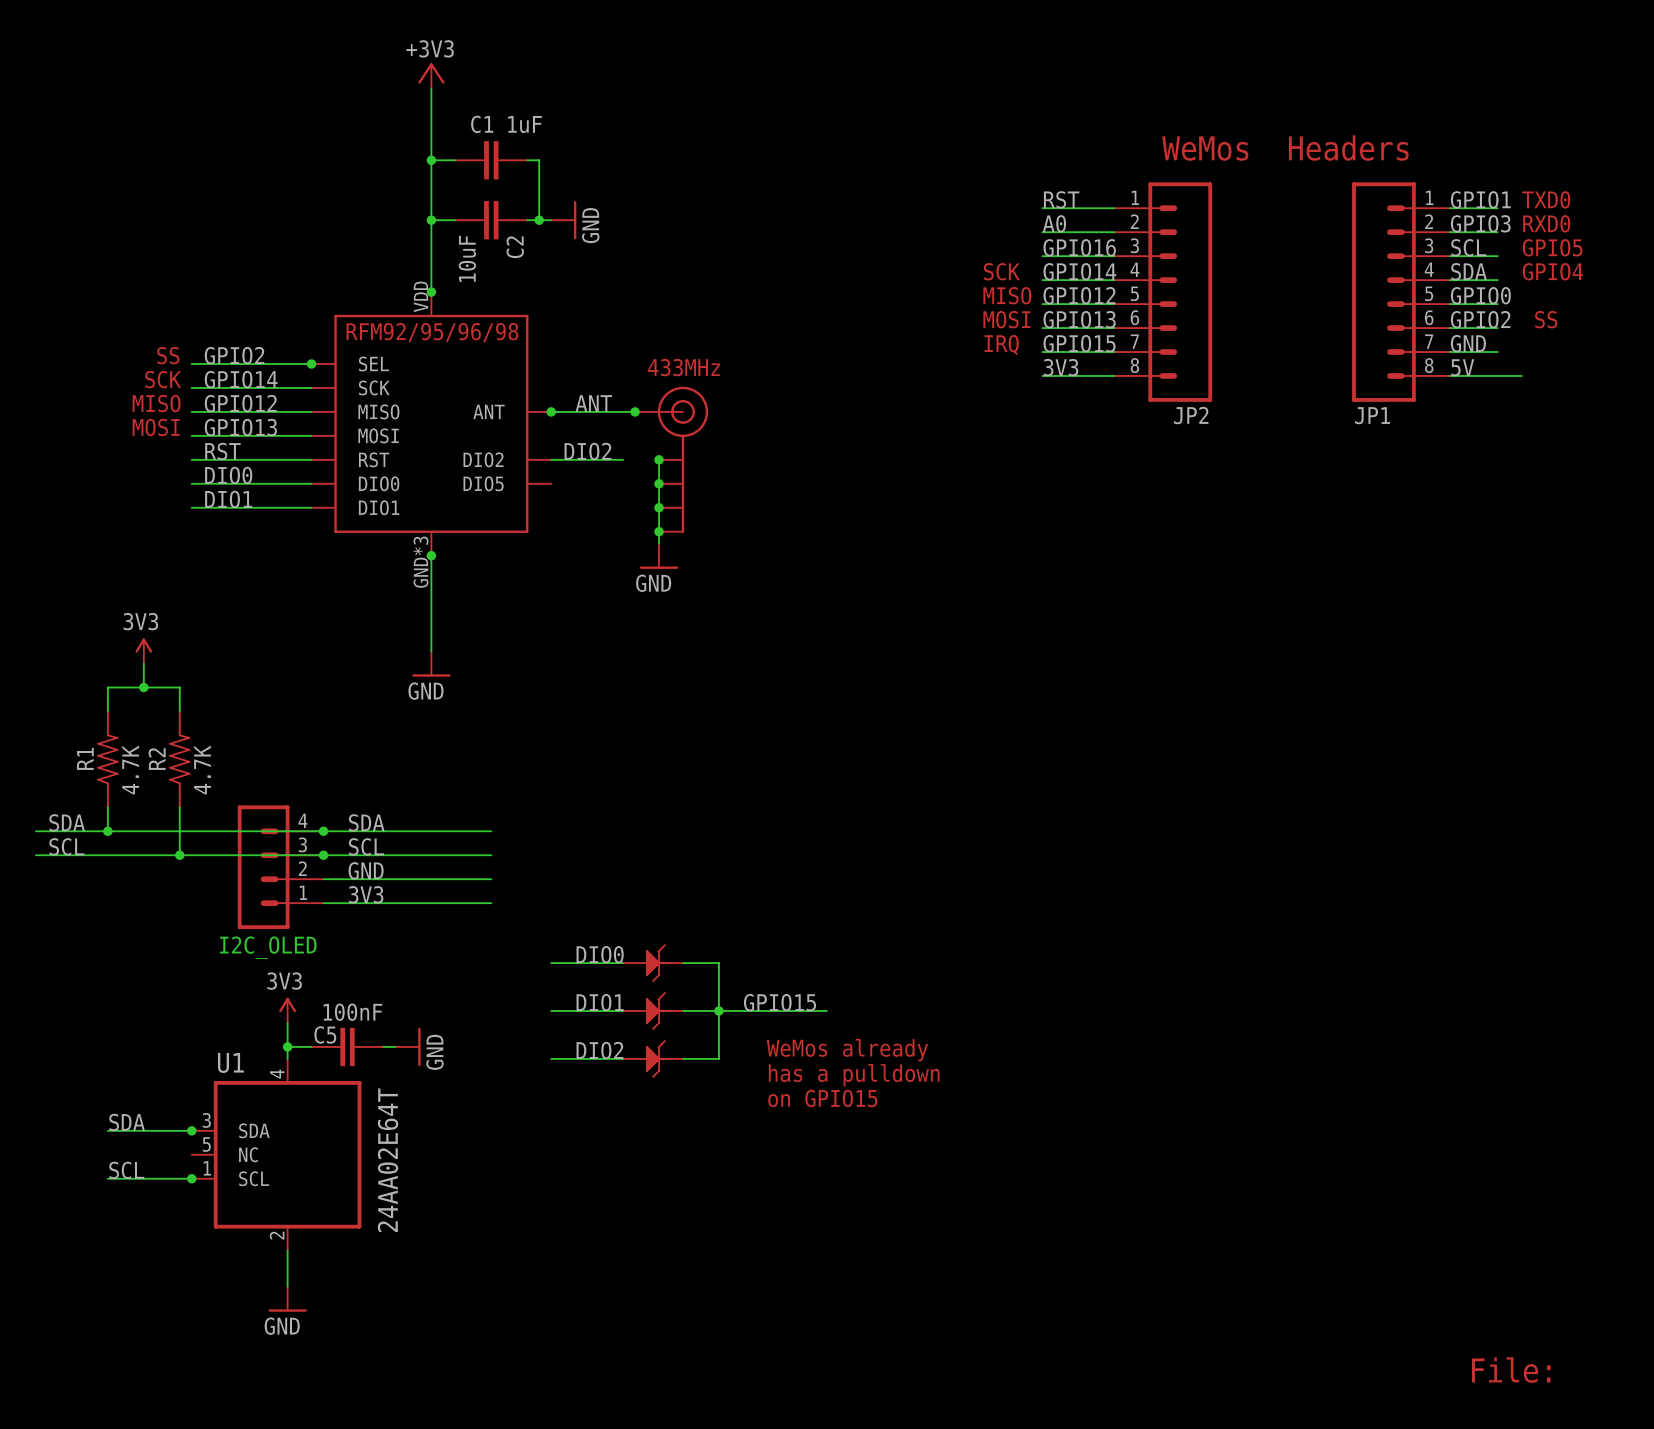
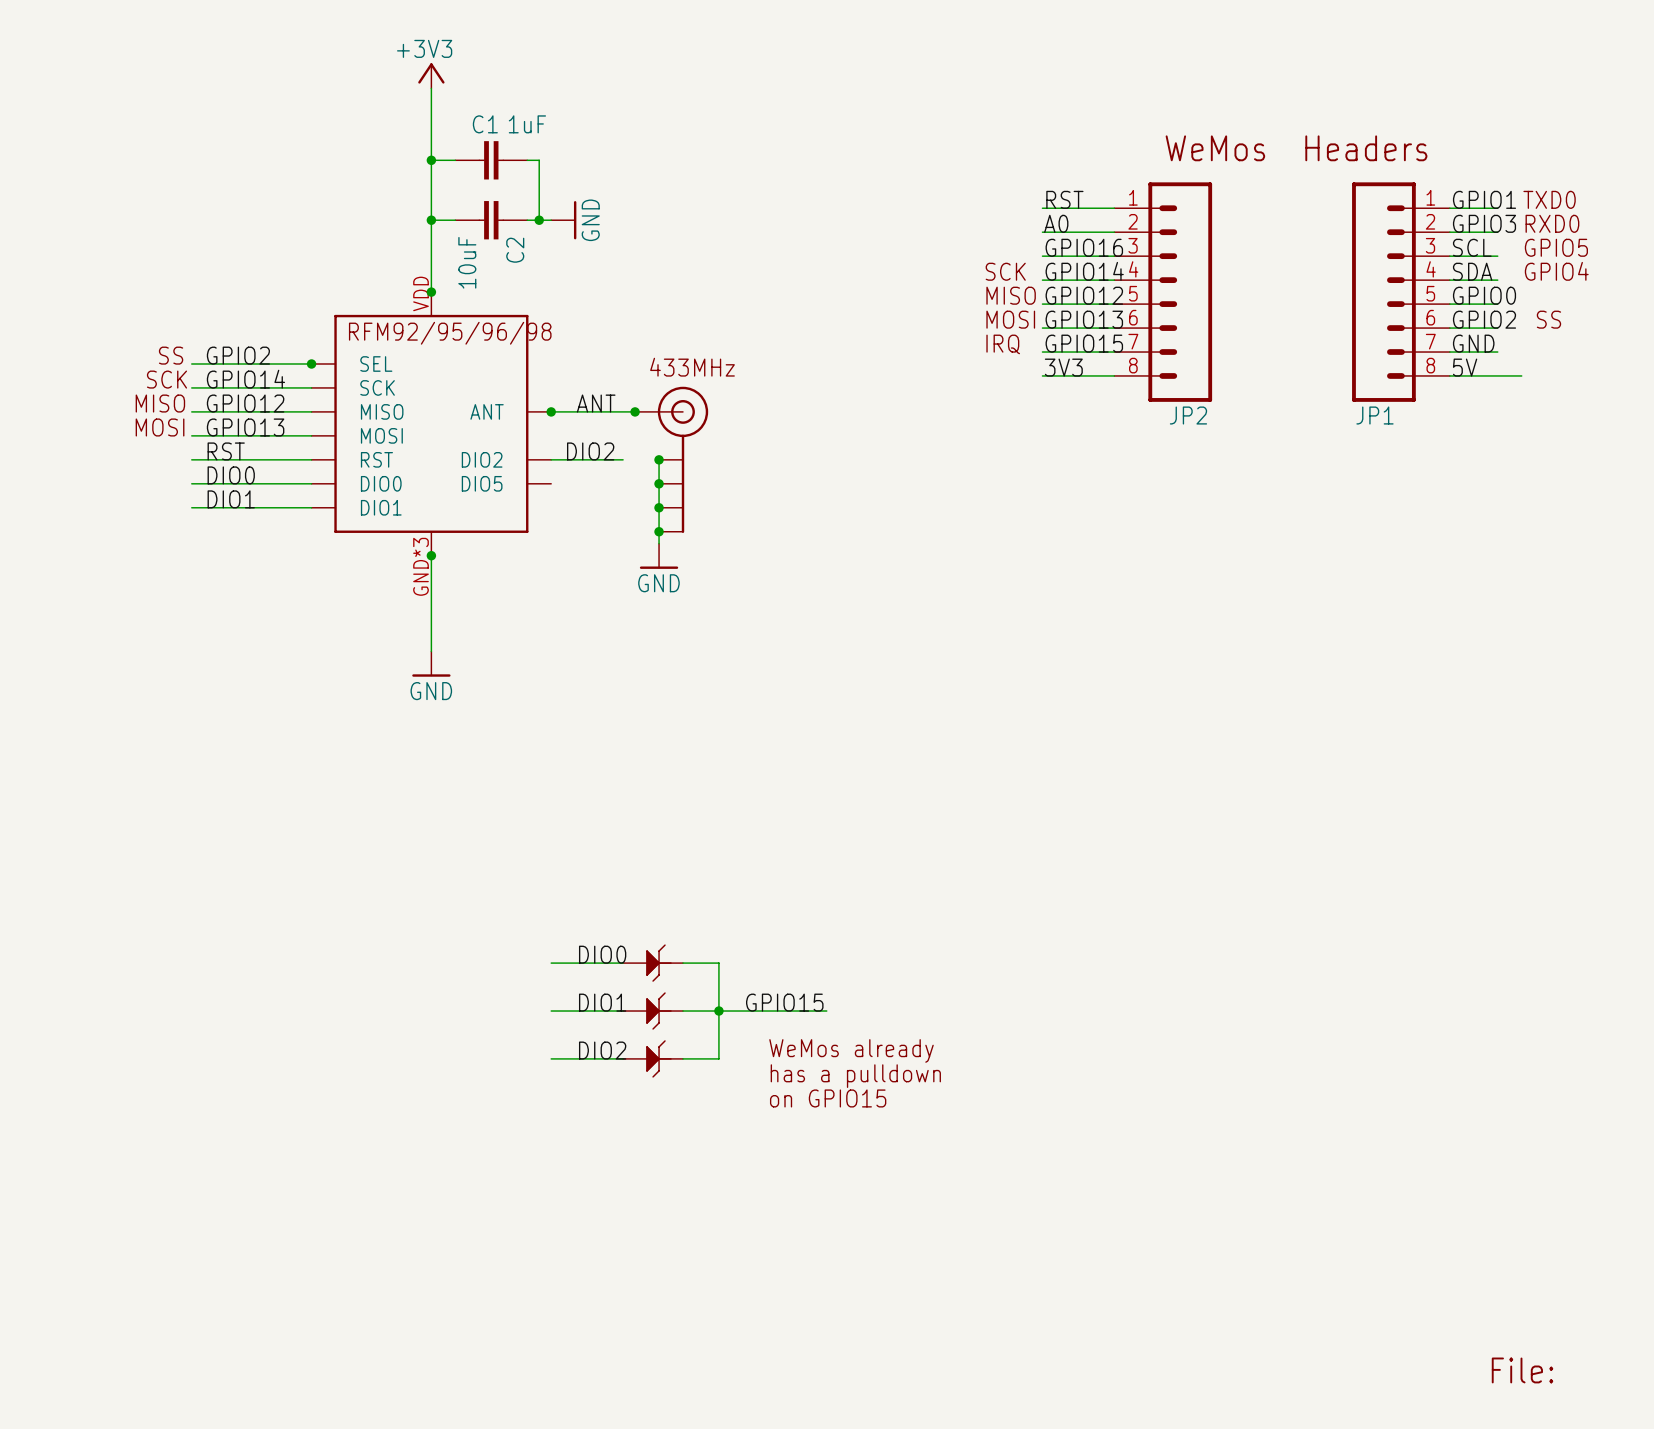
power symbol: 3V3 (143, 650) -> none
wire: (143, 663) (143, 687) -> none
junction: (143, 687) -> none
wire: (107, 711) (107, 687) (179, 687) (179, 711) -> none
R1: 4.7K (107, 759) -> none
R2: 4.7K (179, 759) -> none
wire: (107, 807) (107, 831) -> none
wire: (179, 807) (179, 855) -> none
label: SDA (67, 822) -> none
label: SDA (366, 822) -> none
wire: (35, 831) (491, 831) -> none
junction: (107, 831) -> none
junction: (323, 831) -> none
label: SCL (66, 846) -> none
label: SCL (366, 846) -> none
wire: (35, 855) (491, 855) -> none
junction: (179, 855) -> none
junction: (323, 855) -> none
I2C_OLED: (280, 867) -> none
label: GND (366, 870) -> none
wire: (323, 879) (491, 879) -> none
label: 3V3 (366, 894) -> none
wire: (323, 903) (491, 903) -> none
power symbol: 3V3 (287, 1010) -> none
wire: (287, 1022) (287, 1058) -> none
wire: (287, 1046) (311, 1046) -> none
junction: (287, 1046) -> none
C5: 100nF (347, 1046) -> none
wire: (383, 1046) (395, 1046) -> none
power symbol: GND (408, 1046) -> none
label: SDA (127, 1122) -> none
wire: (107, 1130) (191, 1130) -> none
junction: (191, 1130) -> none
U1: 24AA02E64T (276, 1154) -> none
label: SCL (126, 1170) -> none
wire: (107, 1178) (191, 1178) -> none
junction: (191, 1178) -> none
wire: (287, 1250) (287, 1286) -> none
power symbol: GND (287, 1299) -> none

